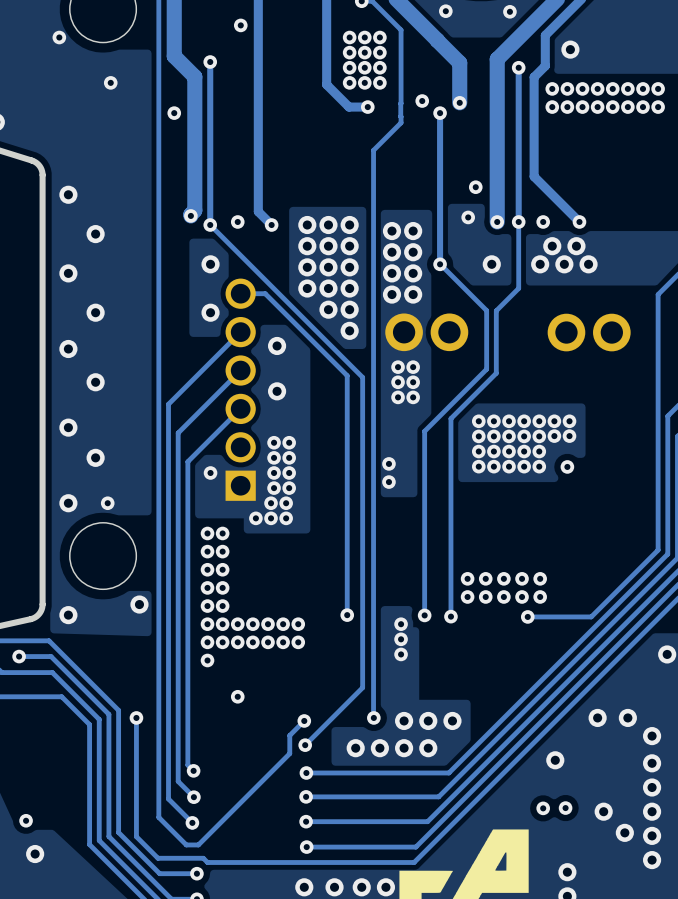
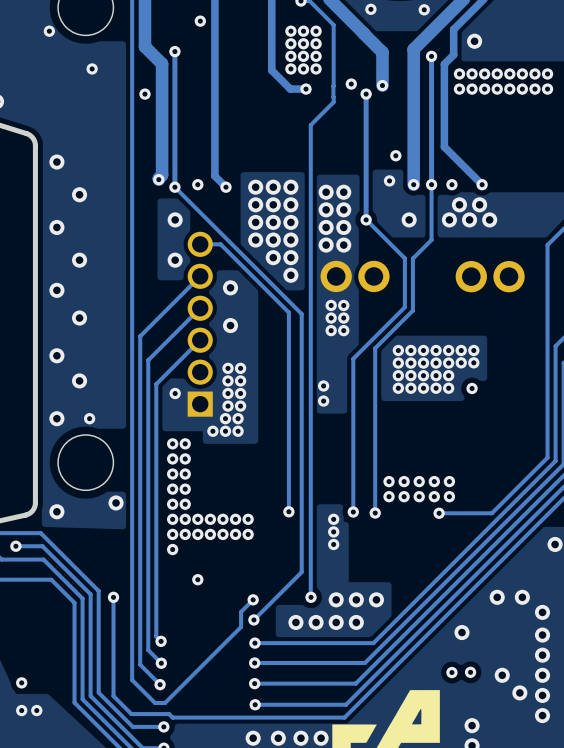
via: none -> (21, 710)
via: (35, 854) -> none
via: none -> (36, 710)

